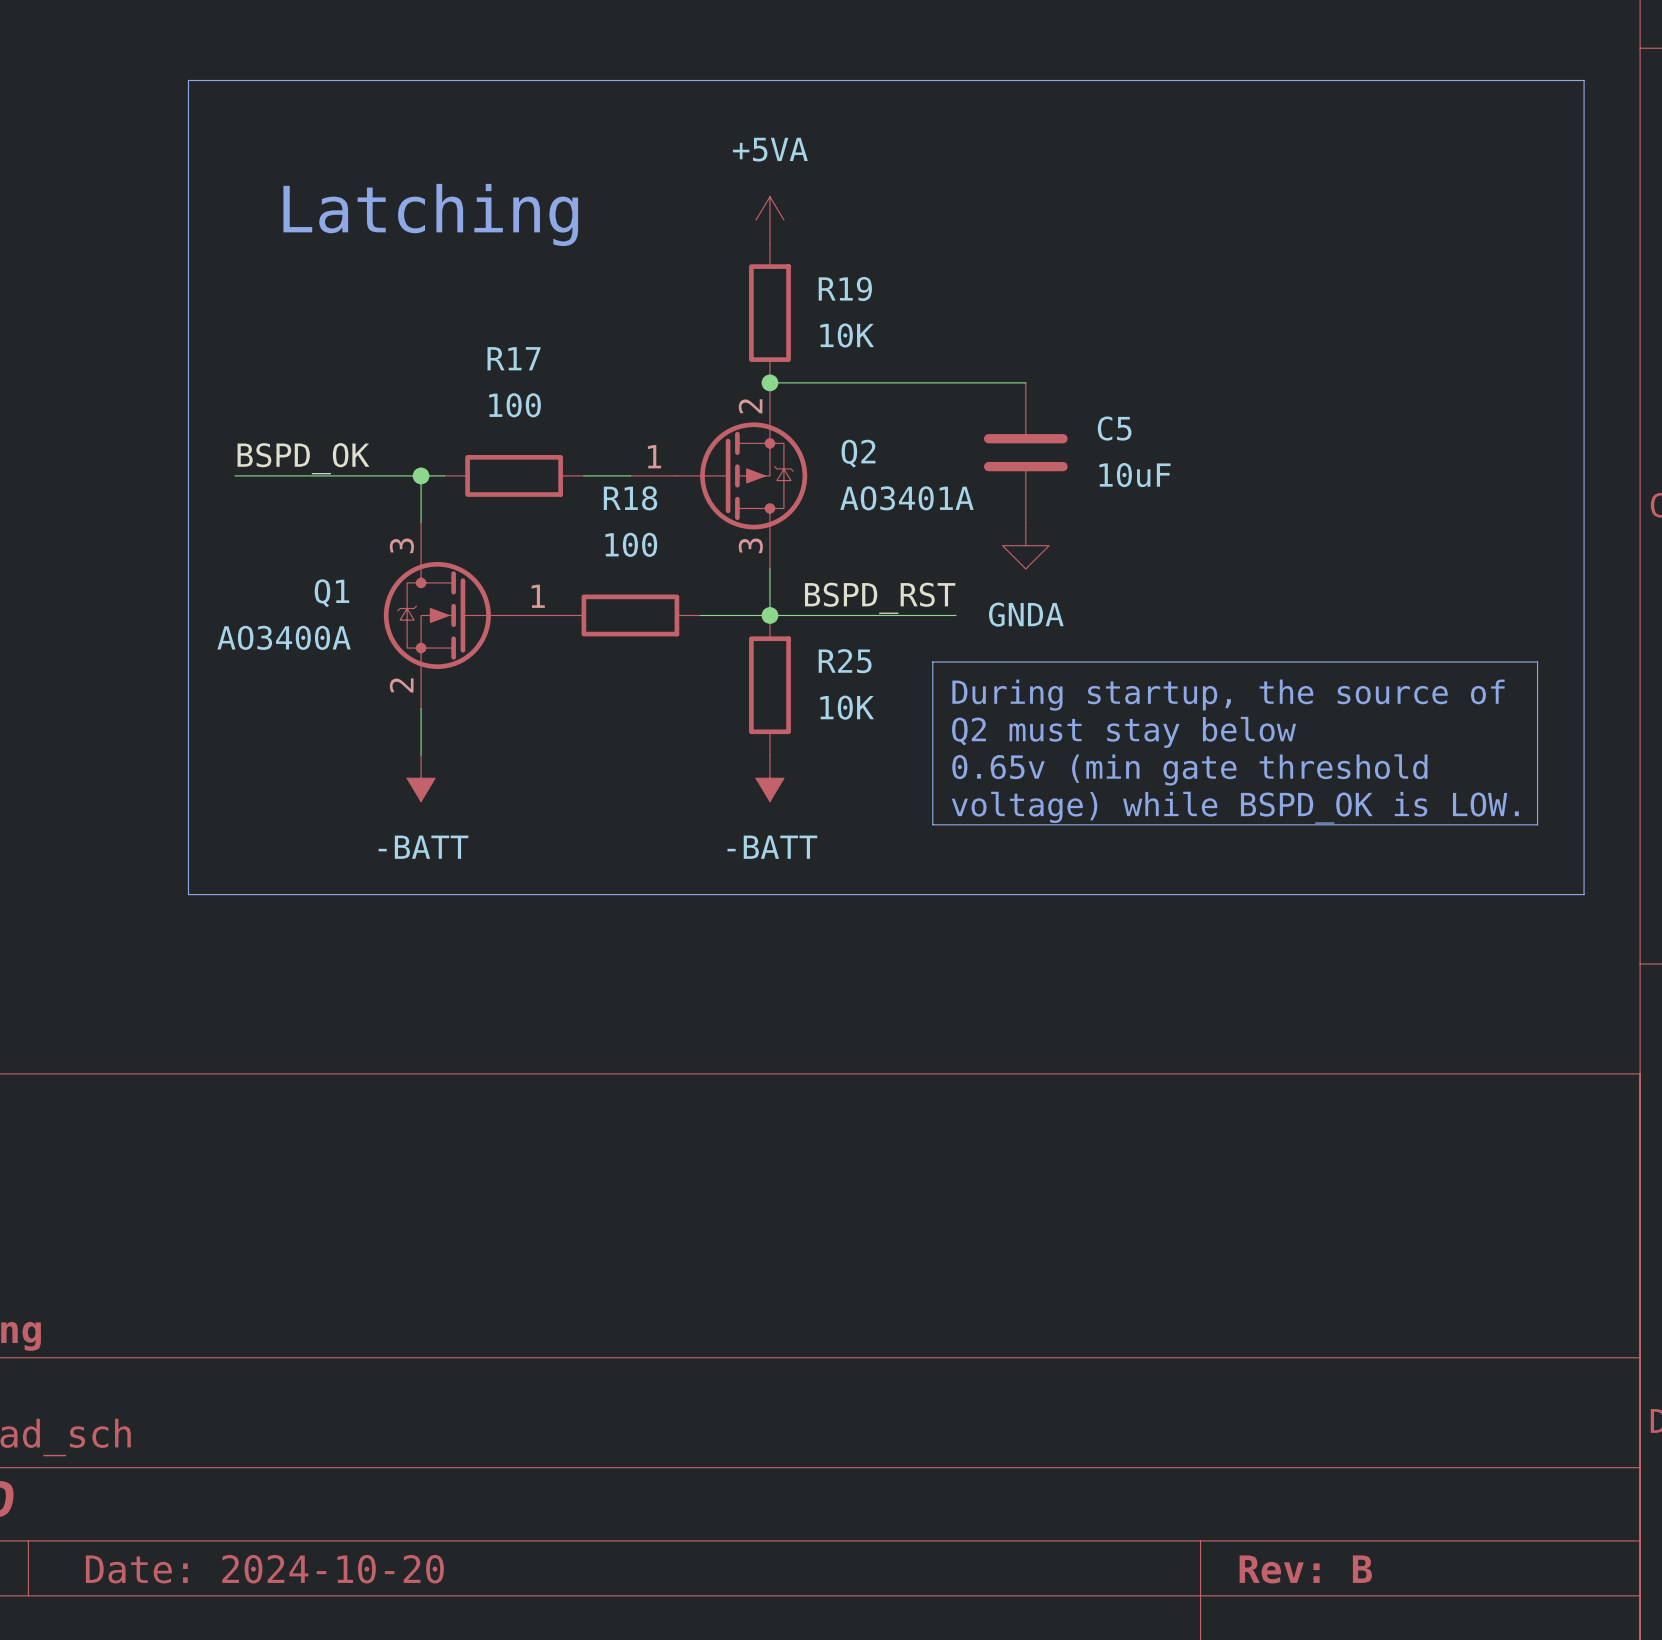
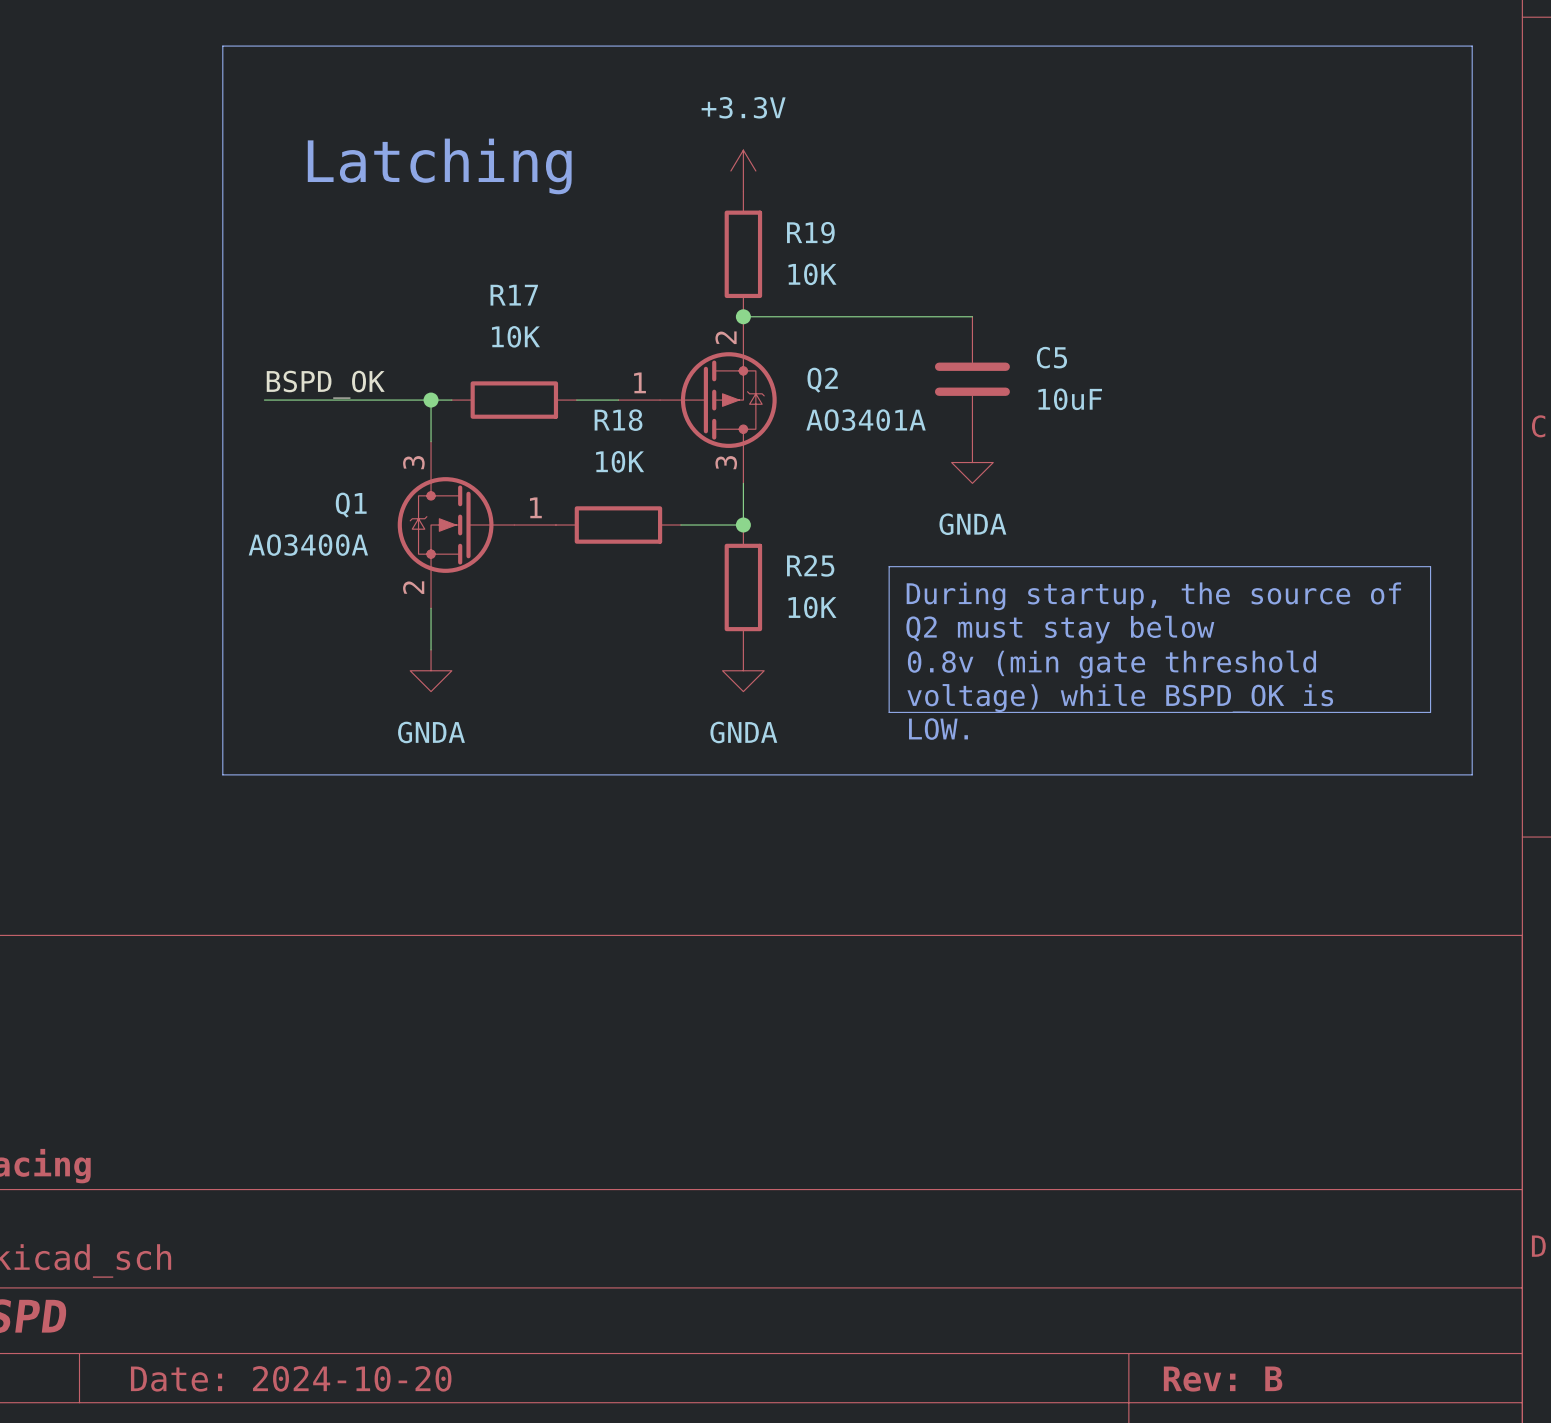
power symbol: +5VA (769, 220) -> +3.3V (743, 171)
R17 value: 100 (514, 405) -> 10K (515, 336)
R18 value: 100 (631, 544) -> 10K (620, 461)
label: BSPD_RST (880, 598) -> none
wire: (769, 615) (956, 615) -> none
text: 0.65v (min gate threshold (1189, 769) -> 0.8v (min gate threshold (1111, 664)
power symbol: -BATT (421, 778) -> GNDA (431, 670)
power symbol: -BATT (769, 778) -> GNDA (743, 670)
text: voltage) while BSPD_OK is LOW. (1235, 807) -> voltage) while BSPD_OK is (1120, 698)
text: none -> LOW. (938, 729)

